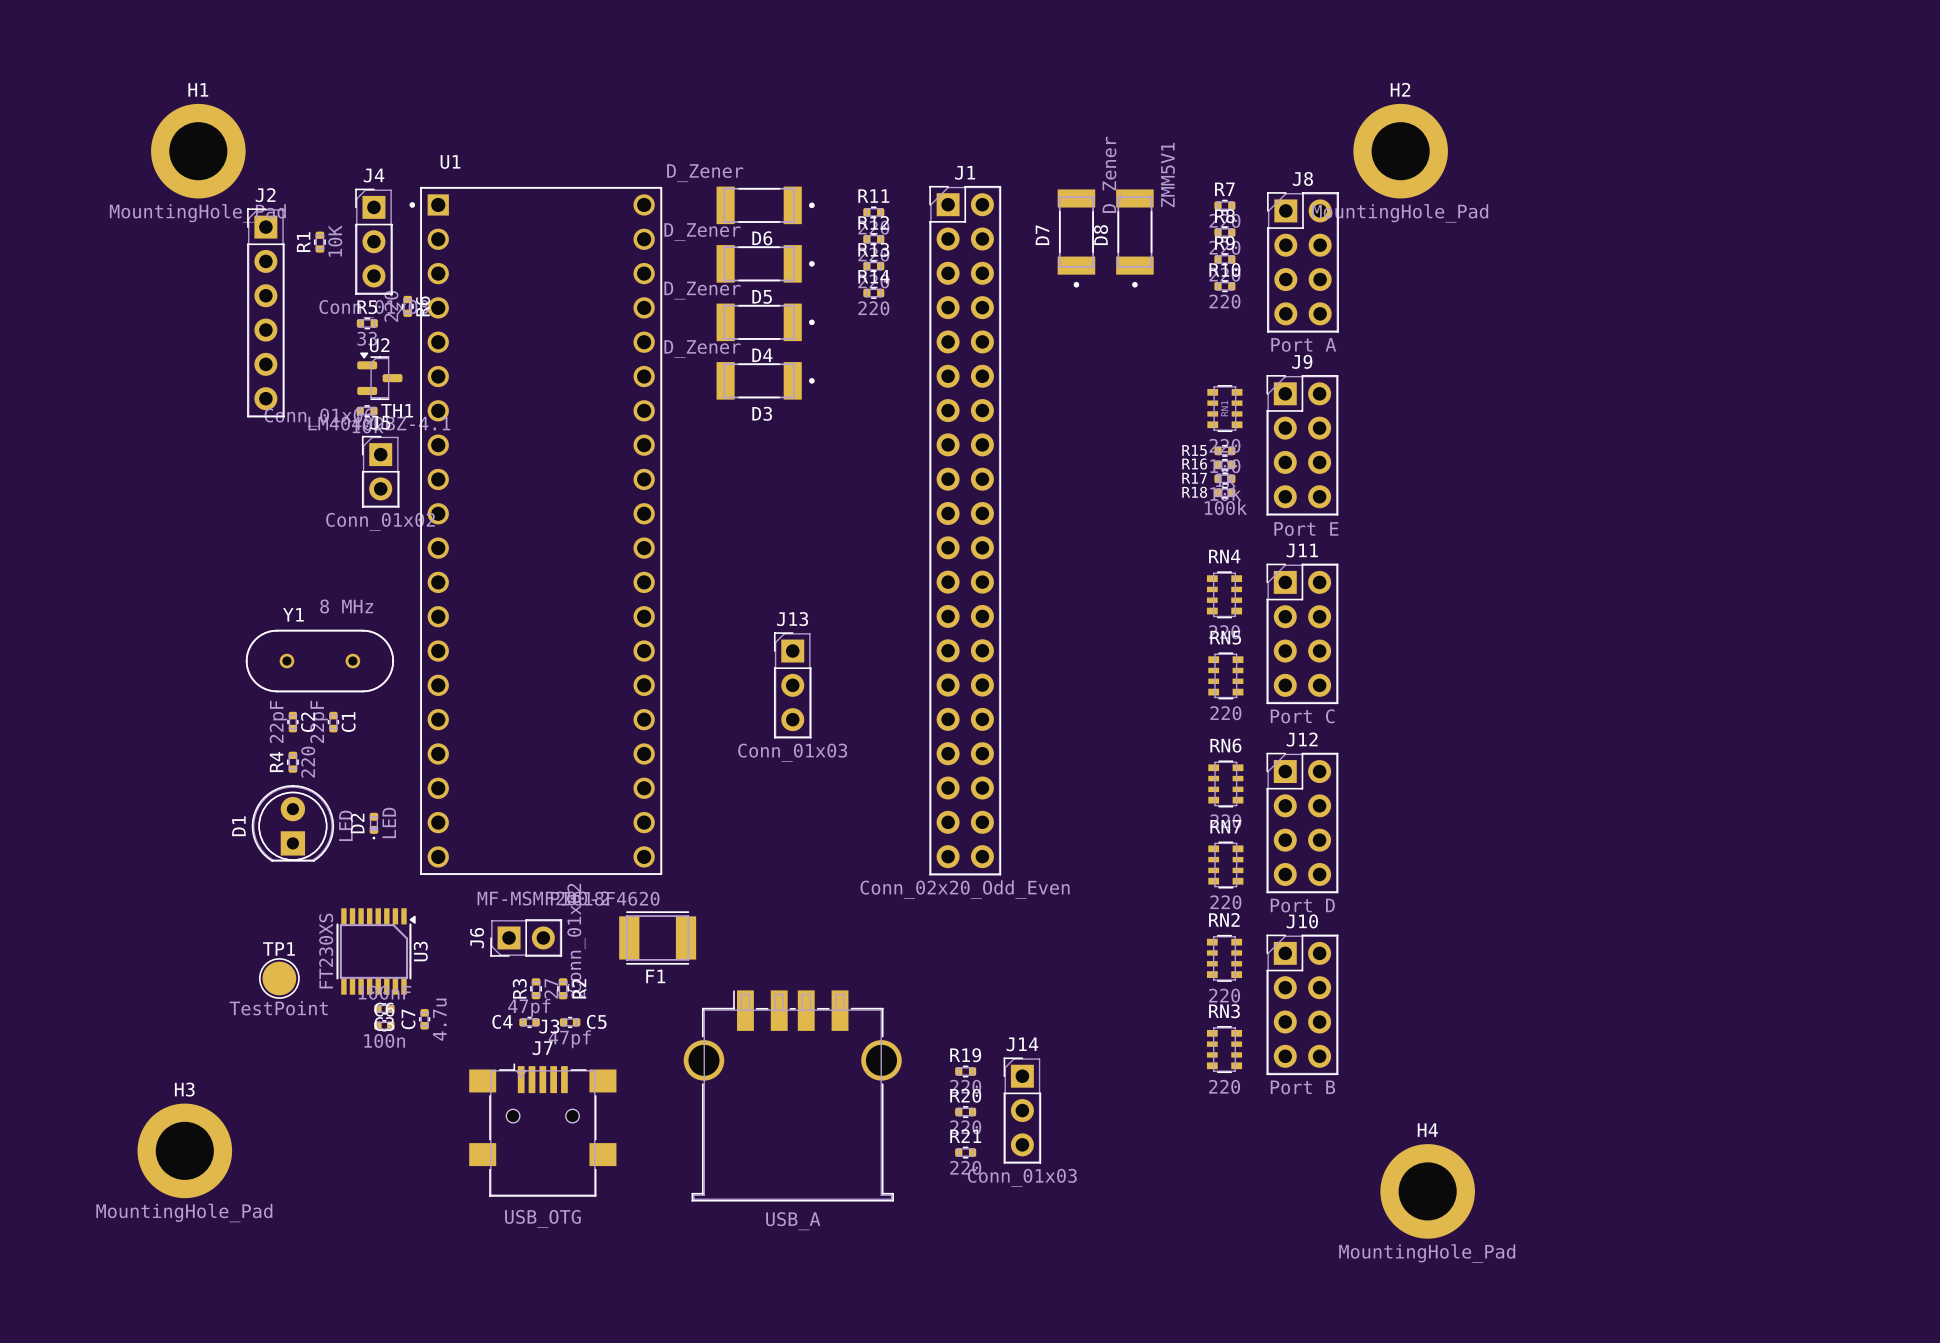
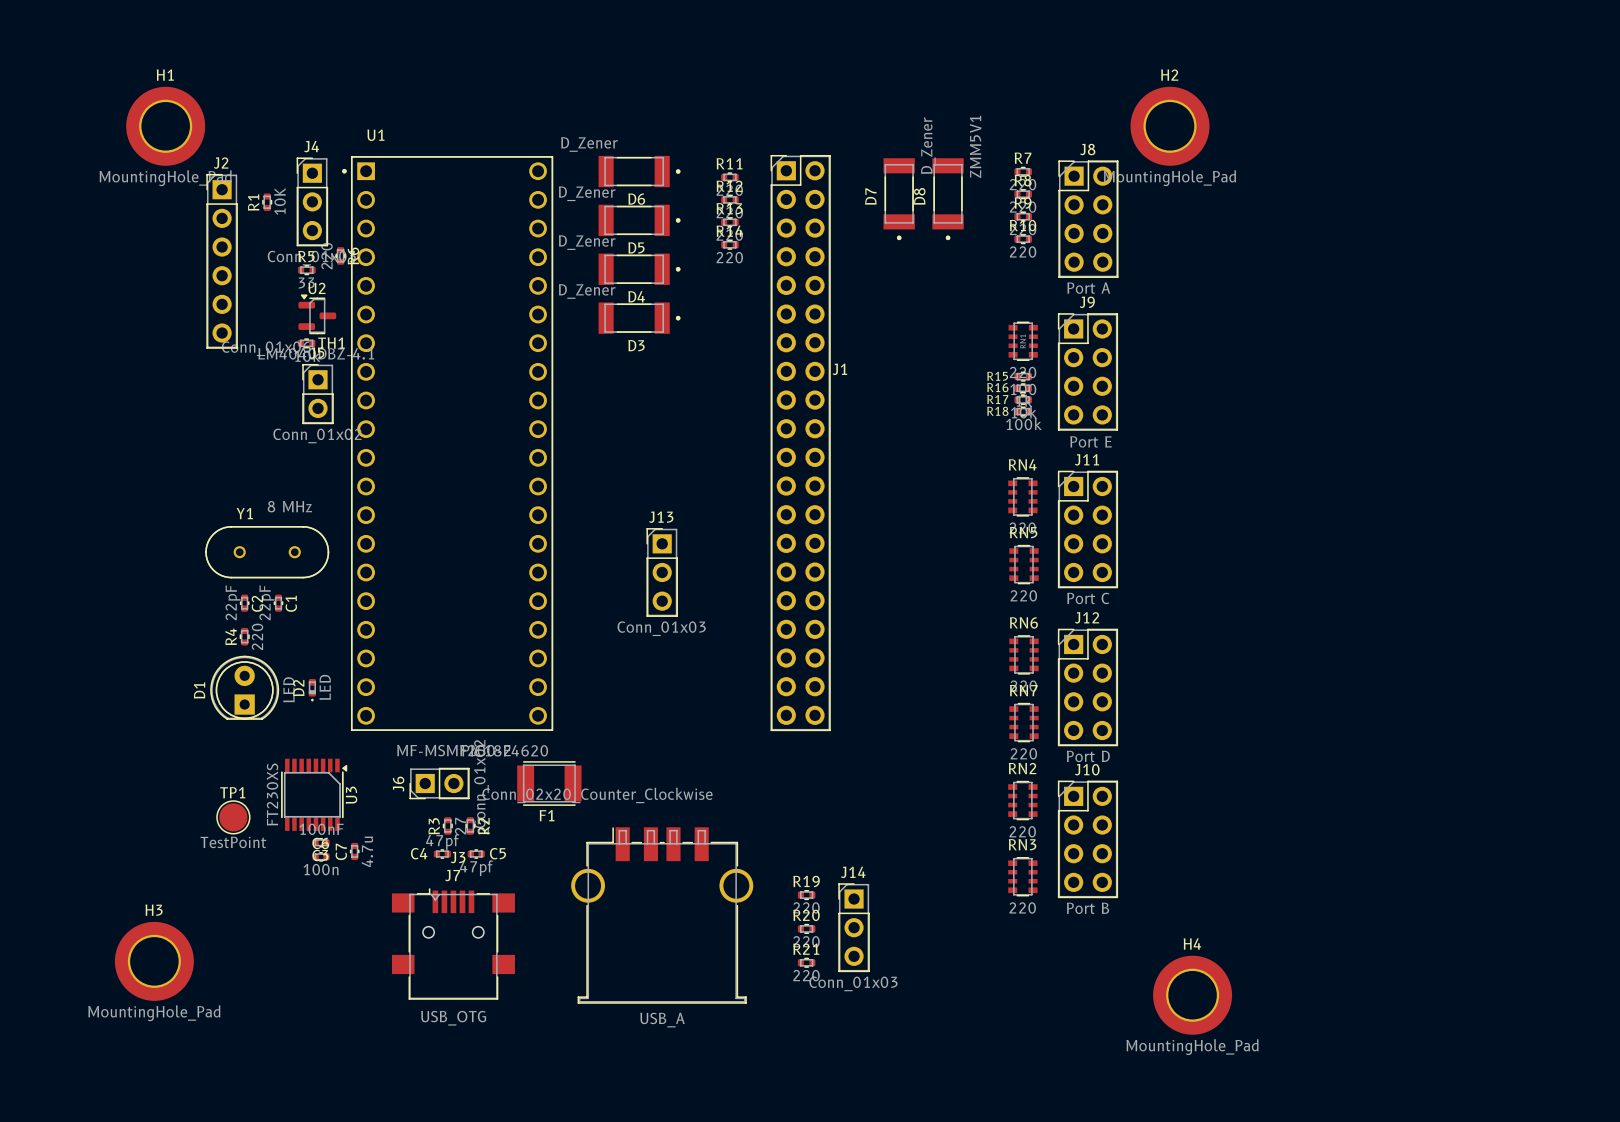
J1 name position: J1 (965, 172) -> J1 (839, 369)
J1 footprint: [929, 185, 1002, 876] -> [770, 155, 831, 732]
J1 value: Conn_02x20_Odd_Even (965, 889) -> Conn_02x20_Counter_Clockwise (597, 795)

